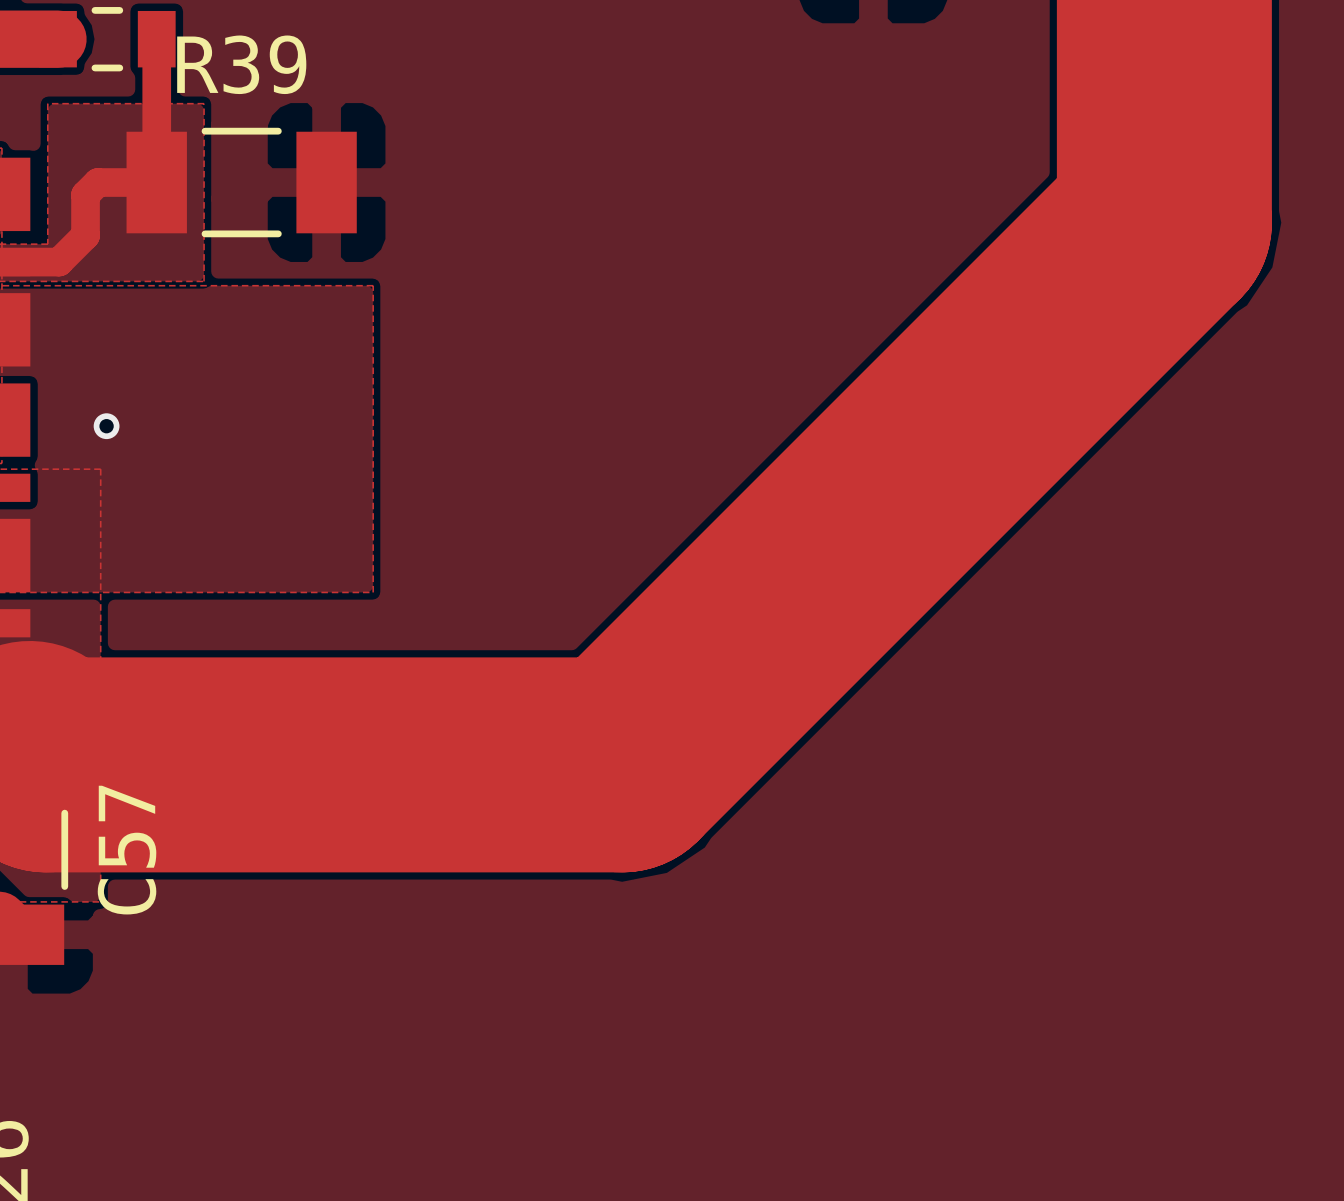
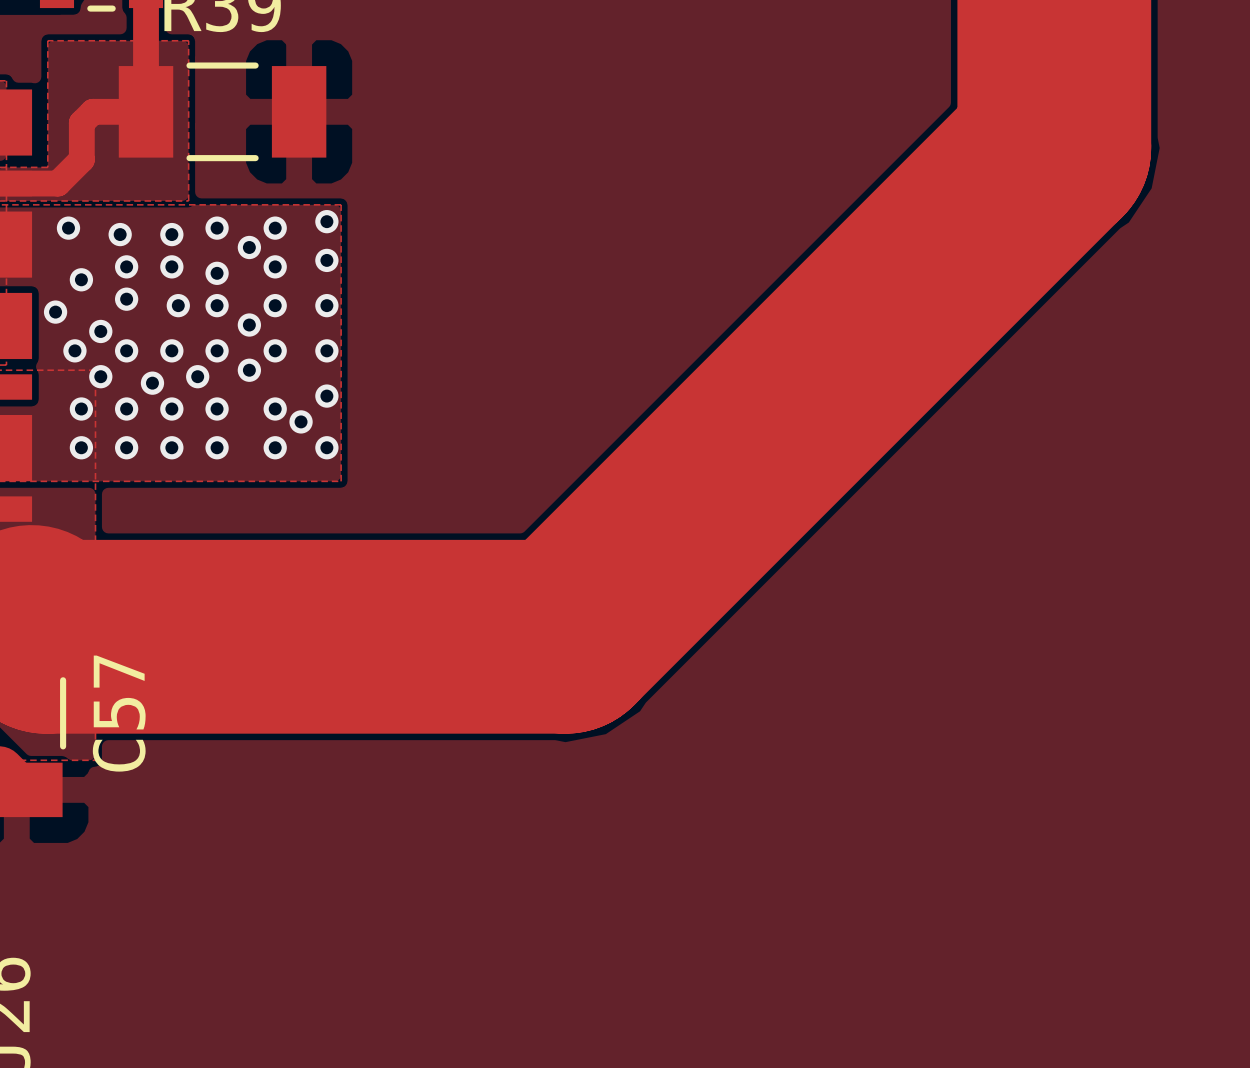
via: none -> (326, 221)
via: none -> (68, 228)
via: none -> (217, 228)
via: none -> (275, 228)
via: none -> (120, 234)
via: none -> (171, 234)
via: none -> (249, 247)
via: none -> (326, 260)
via: none -> (126, 266)
via: none -> (171, 266)
via: none -> (275, 266)
via: none -> (217, 273)
via: none -> (81, 279)
via: none -> (126, 299)
via: none -> (178, 305)
via: none -> (217, 305)
via: none -> (275, 305)
via: none -> (326, 305)
via: none -> (55, 312)
via: none -> (249, 325)
via: none -> (74, 350)
via: none -> (126, 350)
via: none -> (171, 350)
via: none -> (217, 350)
via: none -> (275, 350)
via: none -> (326, 350)
via: none -> (249, 370)
via: none -> (100, 376)
via: none -> (197, 376)
via: none -> (152, 383)
via: none -> (326, 396)
via: none -> (81, 408)
via: none -> (126, 408)
via: none -> (171, 408)
via: none -> (217, 408)
via: none -> (275, 408)
via: none -> (301, 421)
via: none -> (81, 447)
via: none -> (126, 447)
via: none -> (171, 447)
via: none -> (217, 447)
via: none -> (275, 447)
via: none -> (326, 447)

